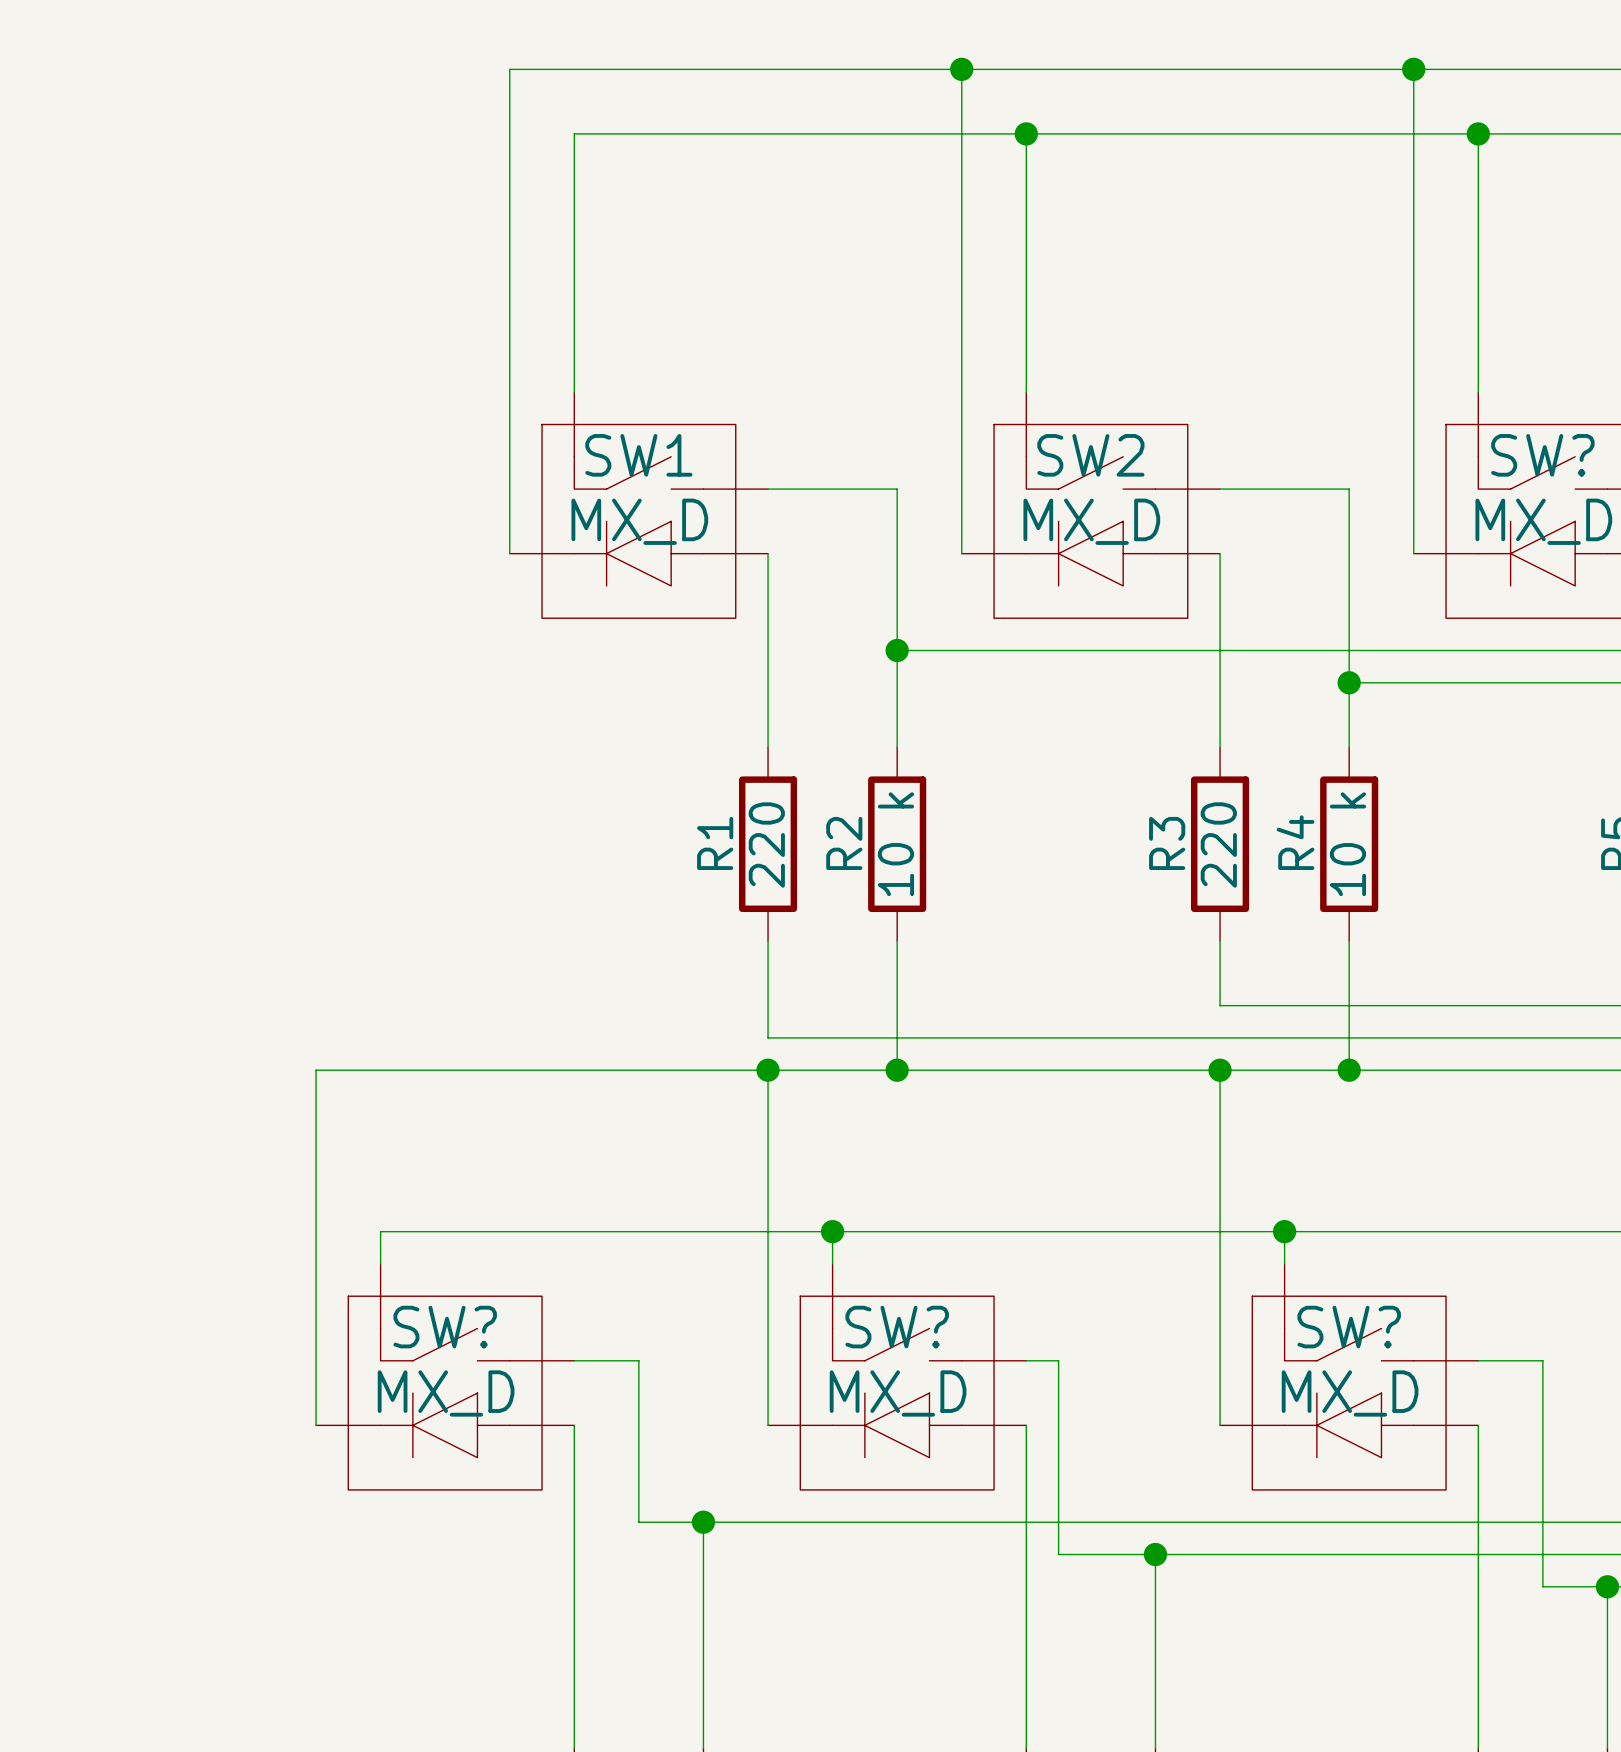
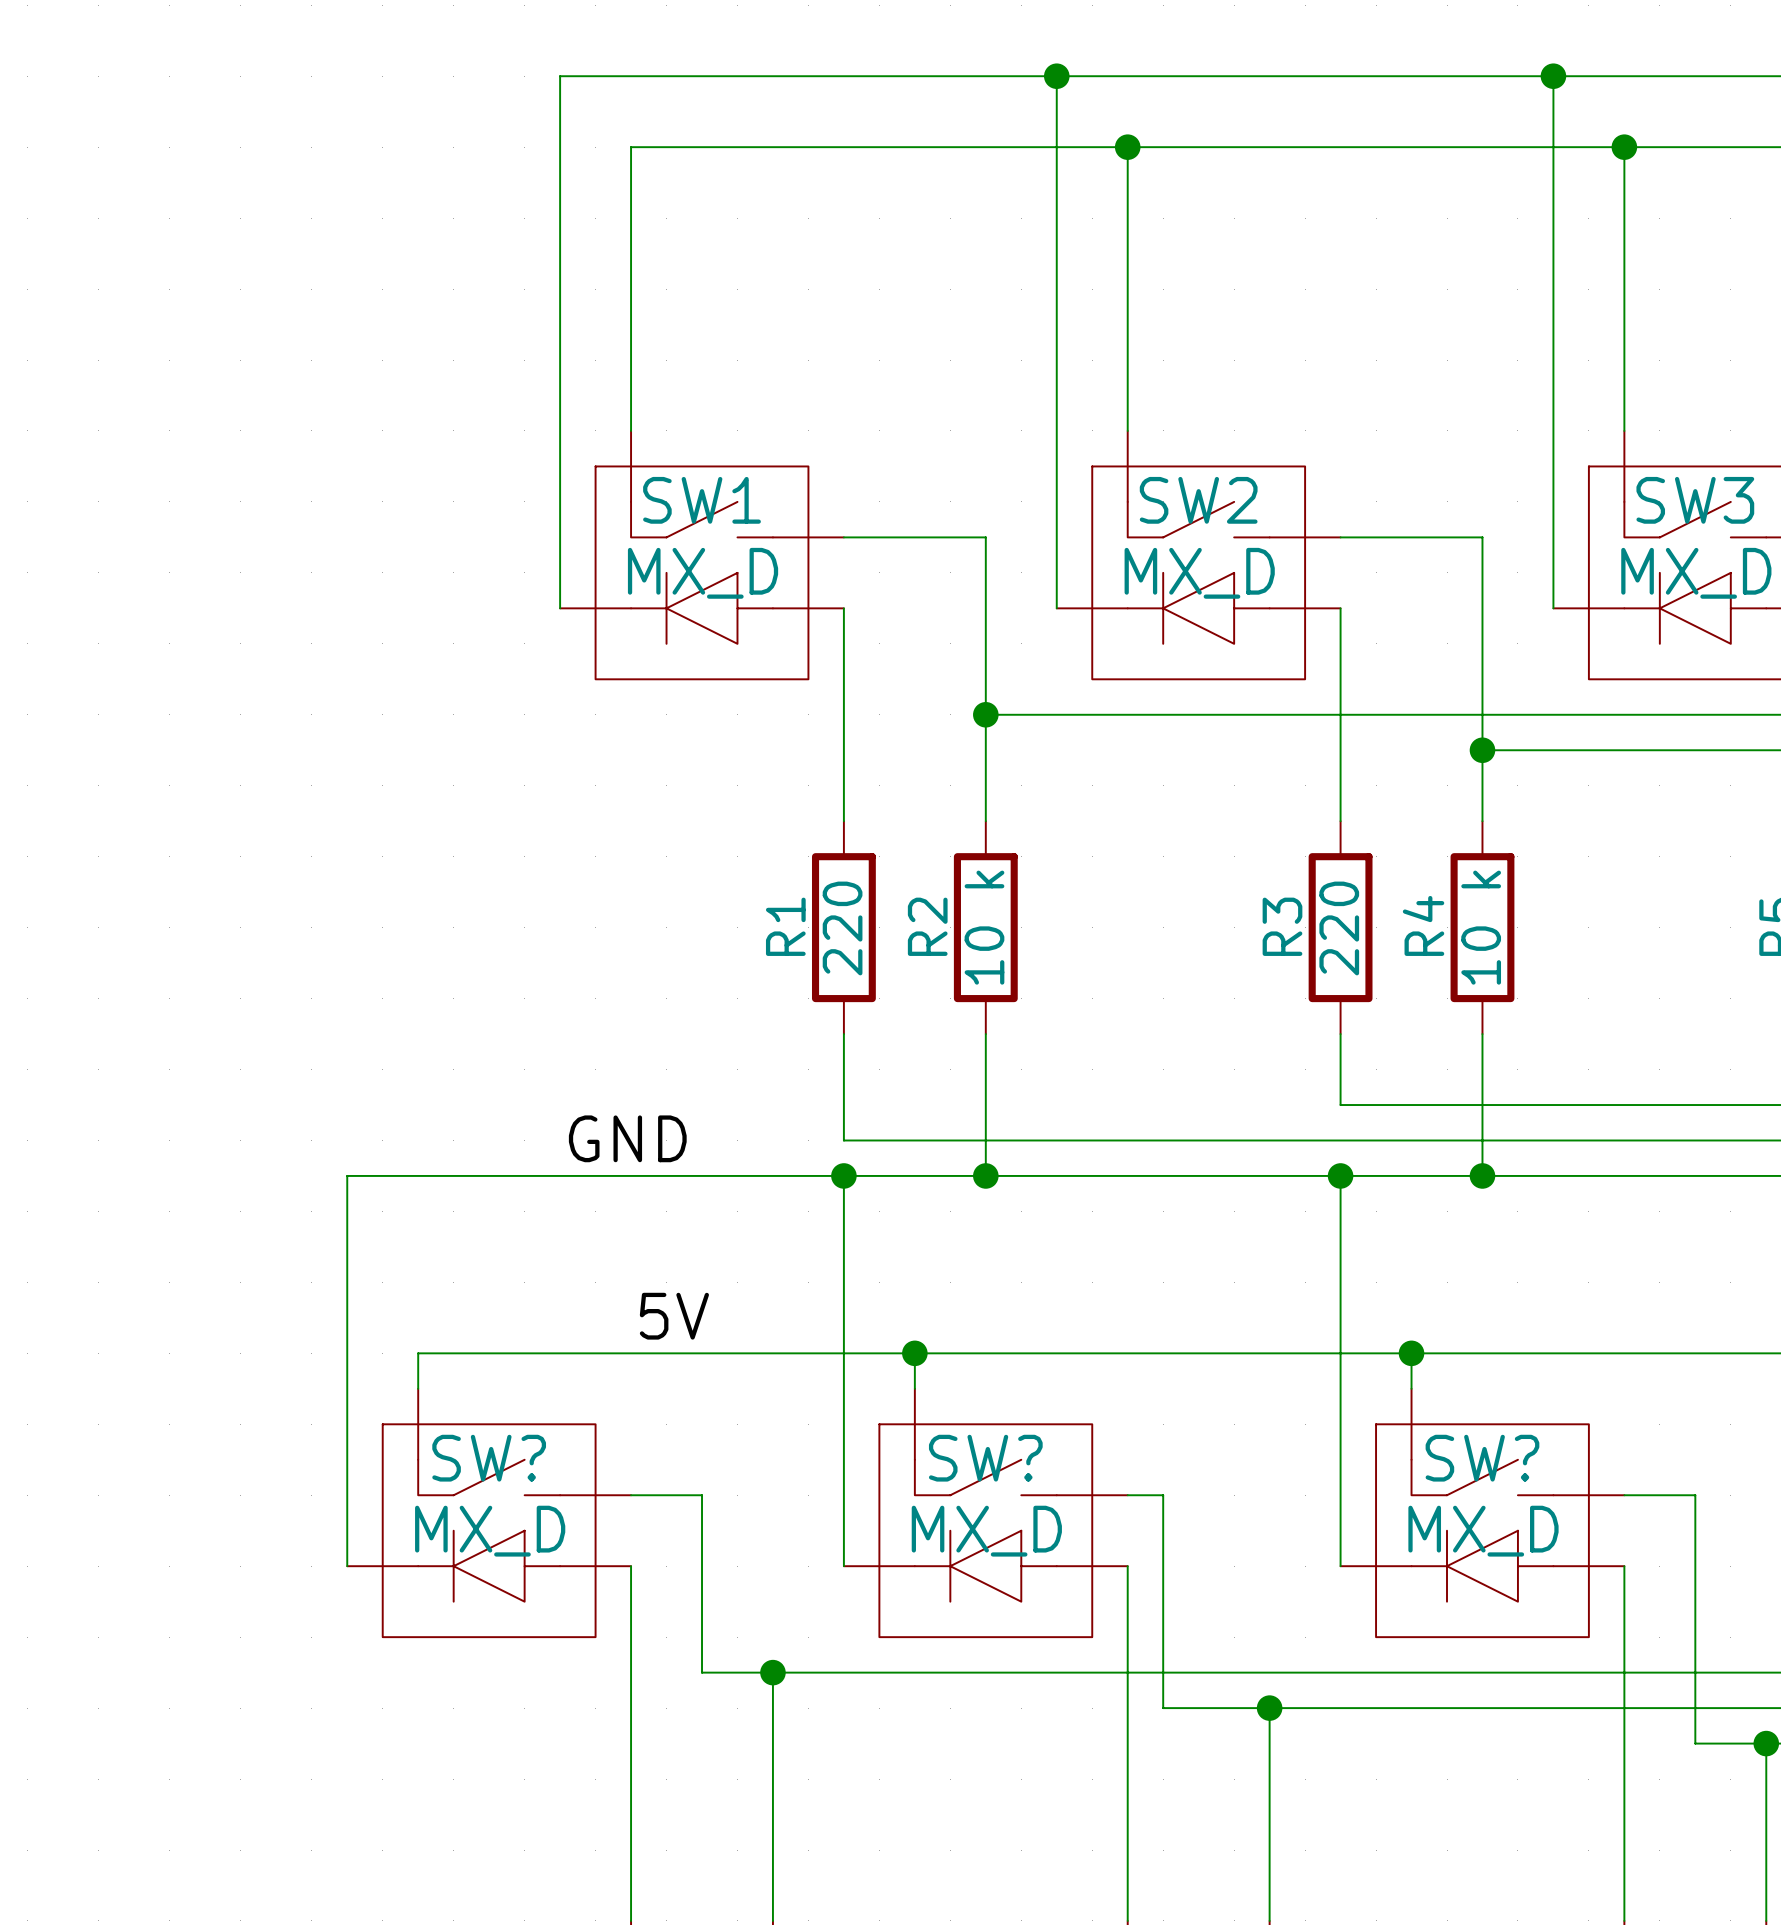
SW? name: SW? (1542, 455) -> SW3 (1695, 500)
label: none -> GND (627, 1138)
label: none -> 5V (674, 1316)

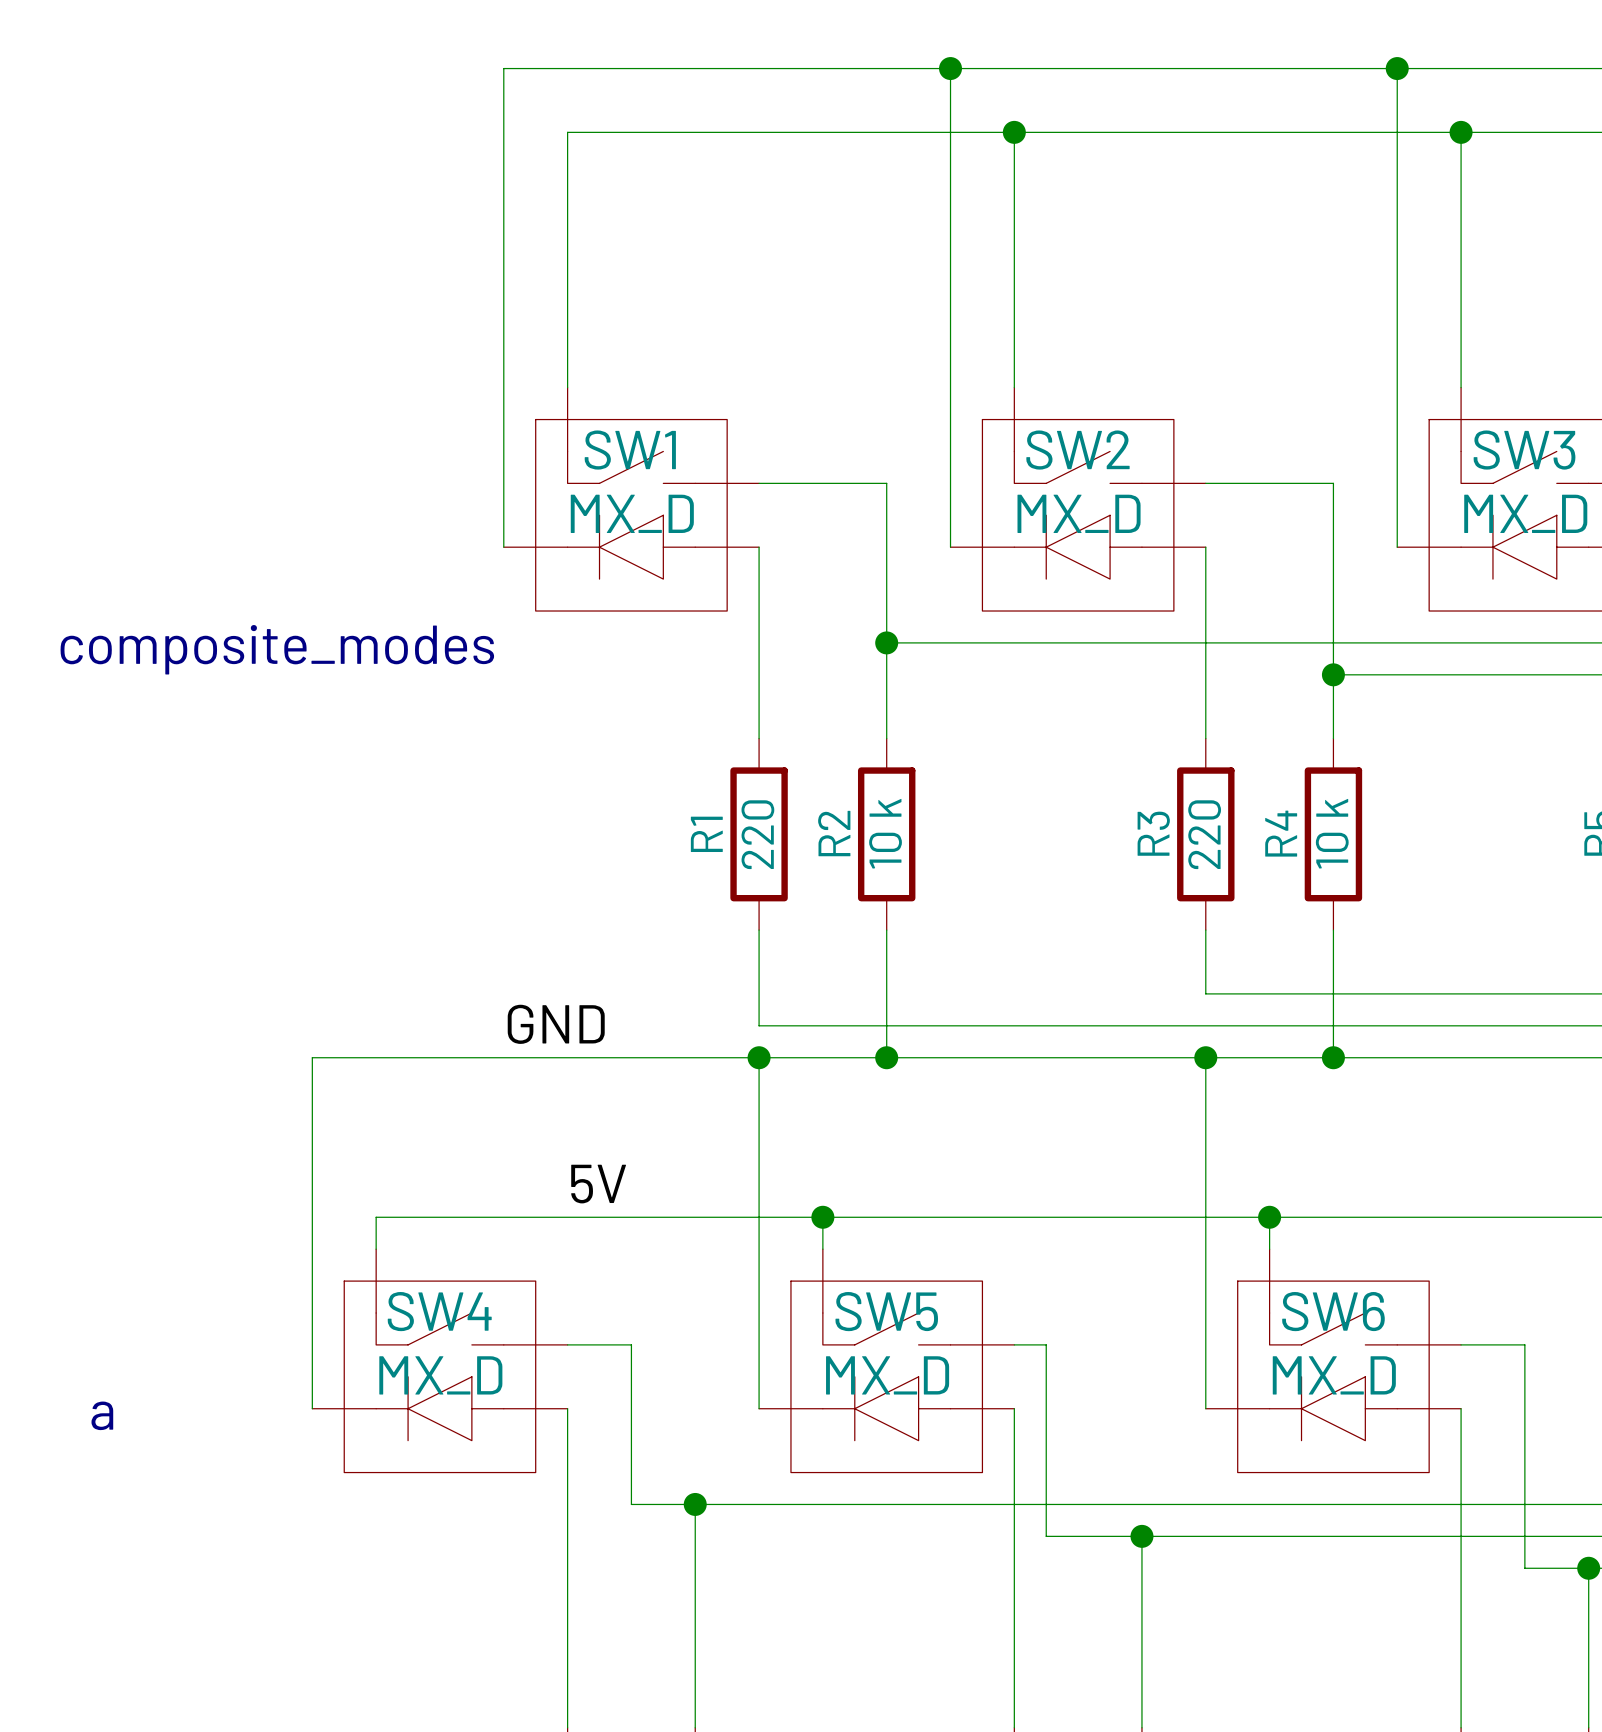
text: none -> composite_modes (277, 649)
SW? name: SW? (489, 1458) -> SW4 (439, 1311)
SW? name: SW? (985, 1458) -> SW5 (886, 1311)
SW? name: SW? (1482, 1458) -> SW6 (1333, 1311)
text: none -> a (102, 1415)

